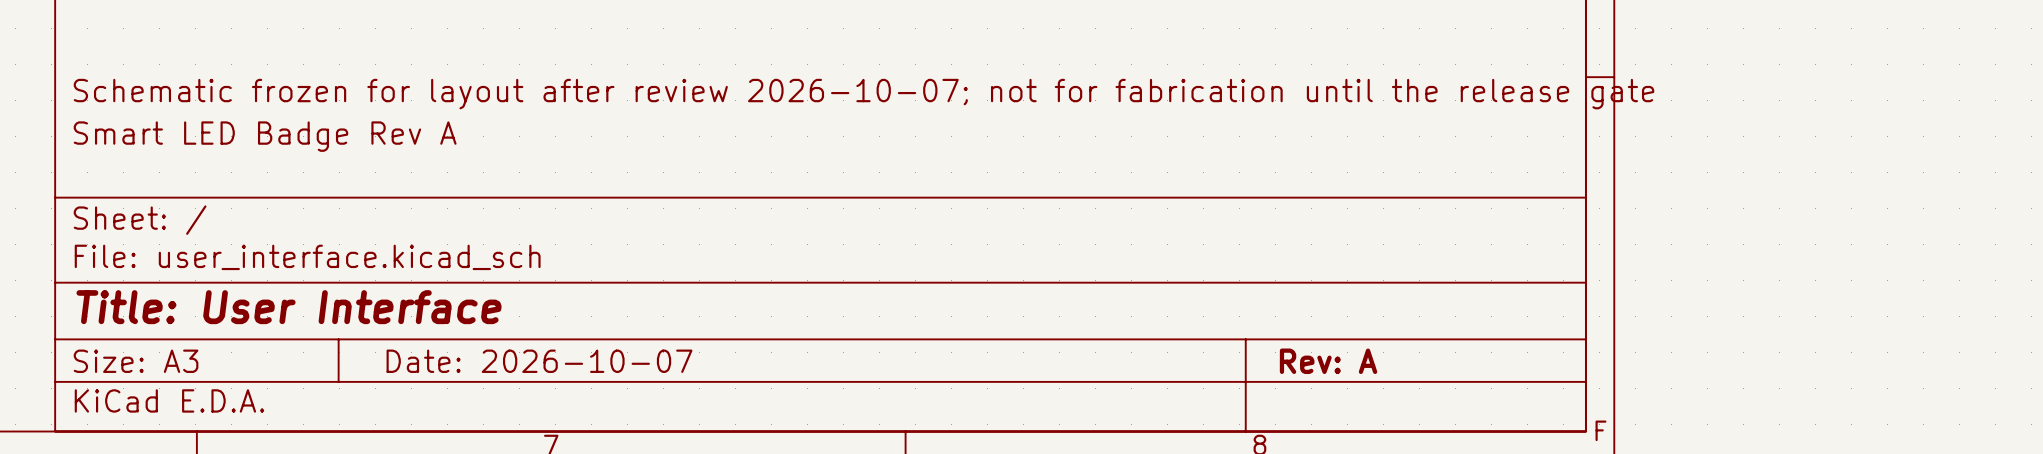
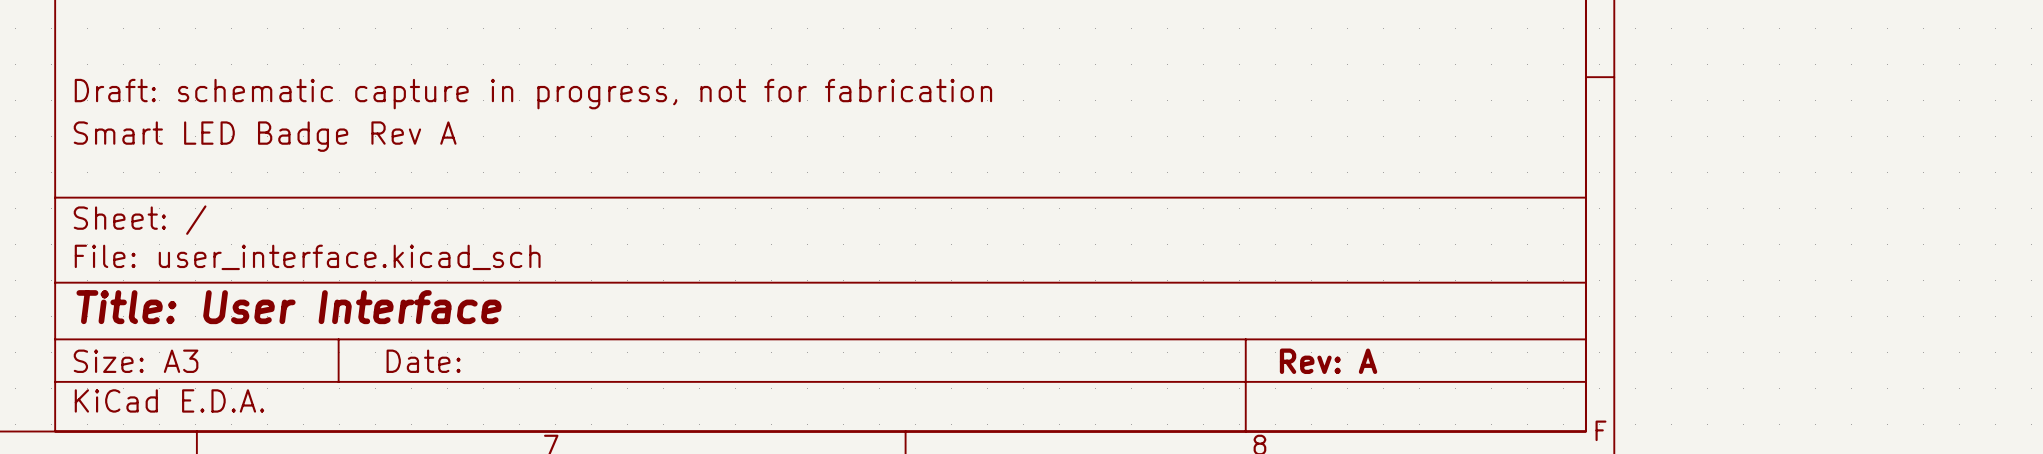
title block: Schematic frozen for layout after review 2026-10-07; not for fabrication until the release gate (863, 94) -> Draft: schematic capture in progress, not for fabrication (533, 94)
title block: Date: 2026-10-07 (539, 361) -> Date: (423, 361)

